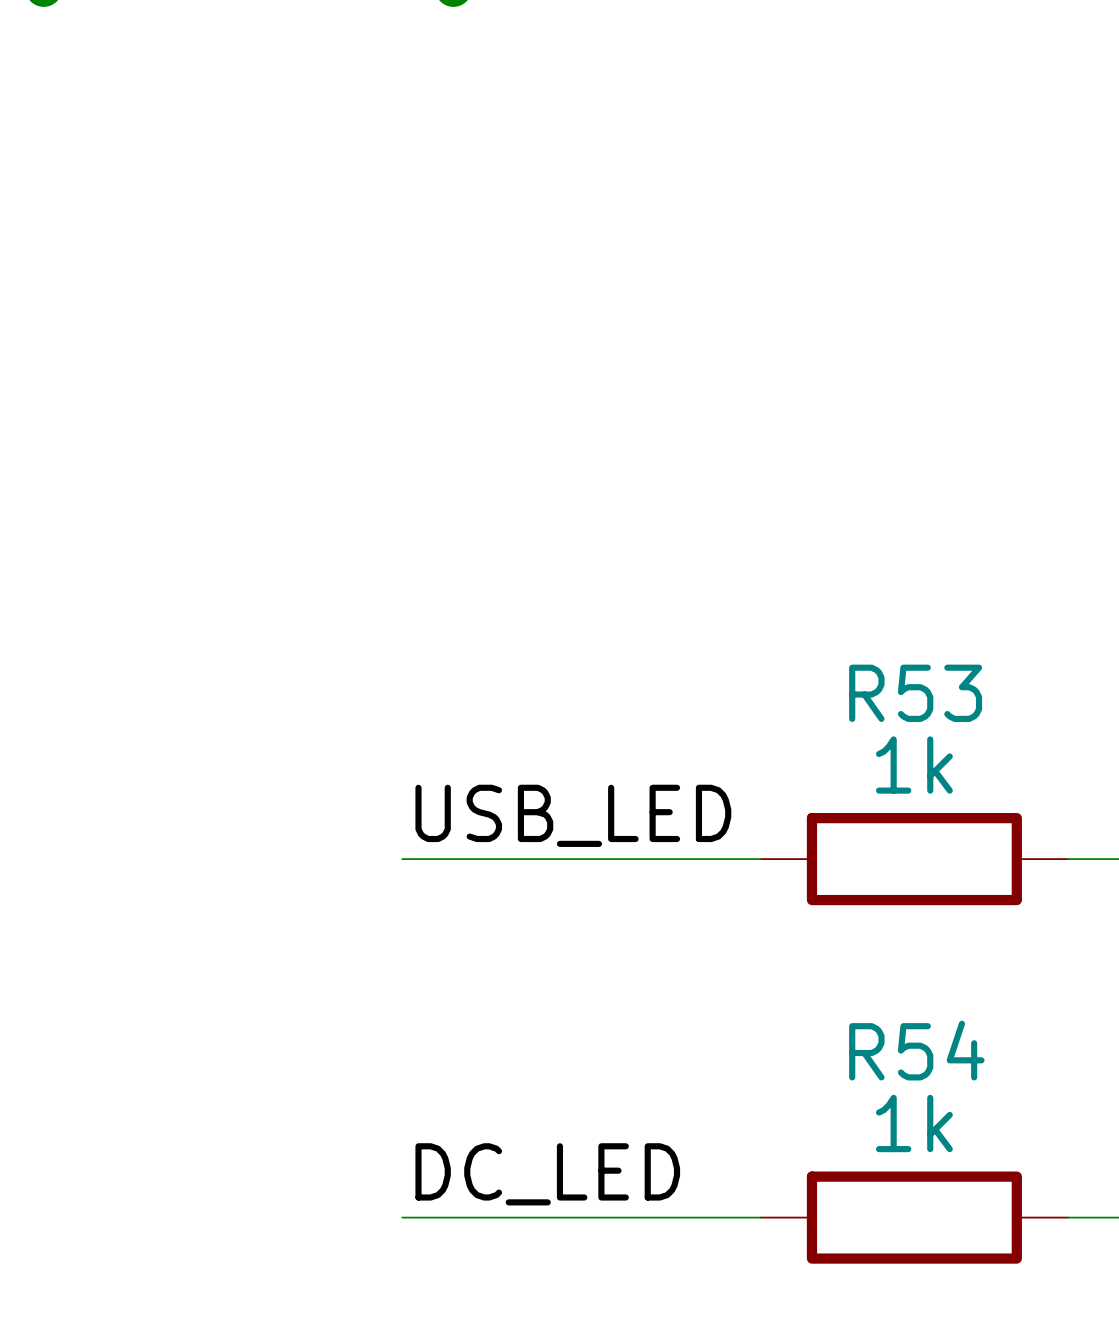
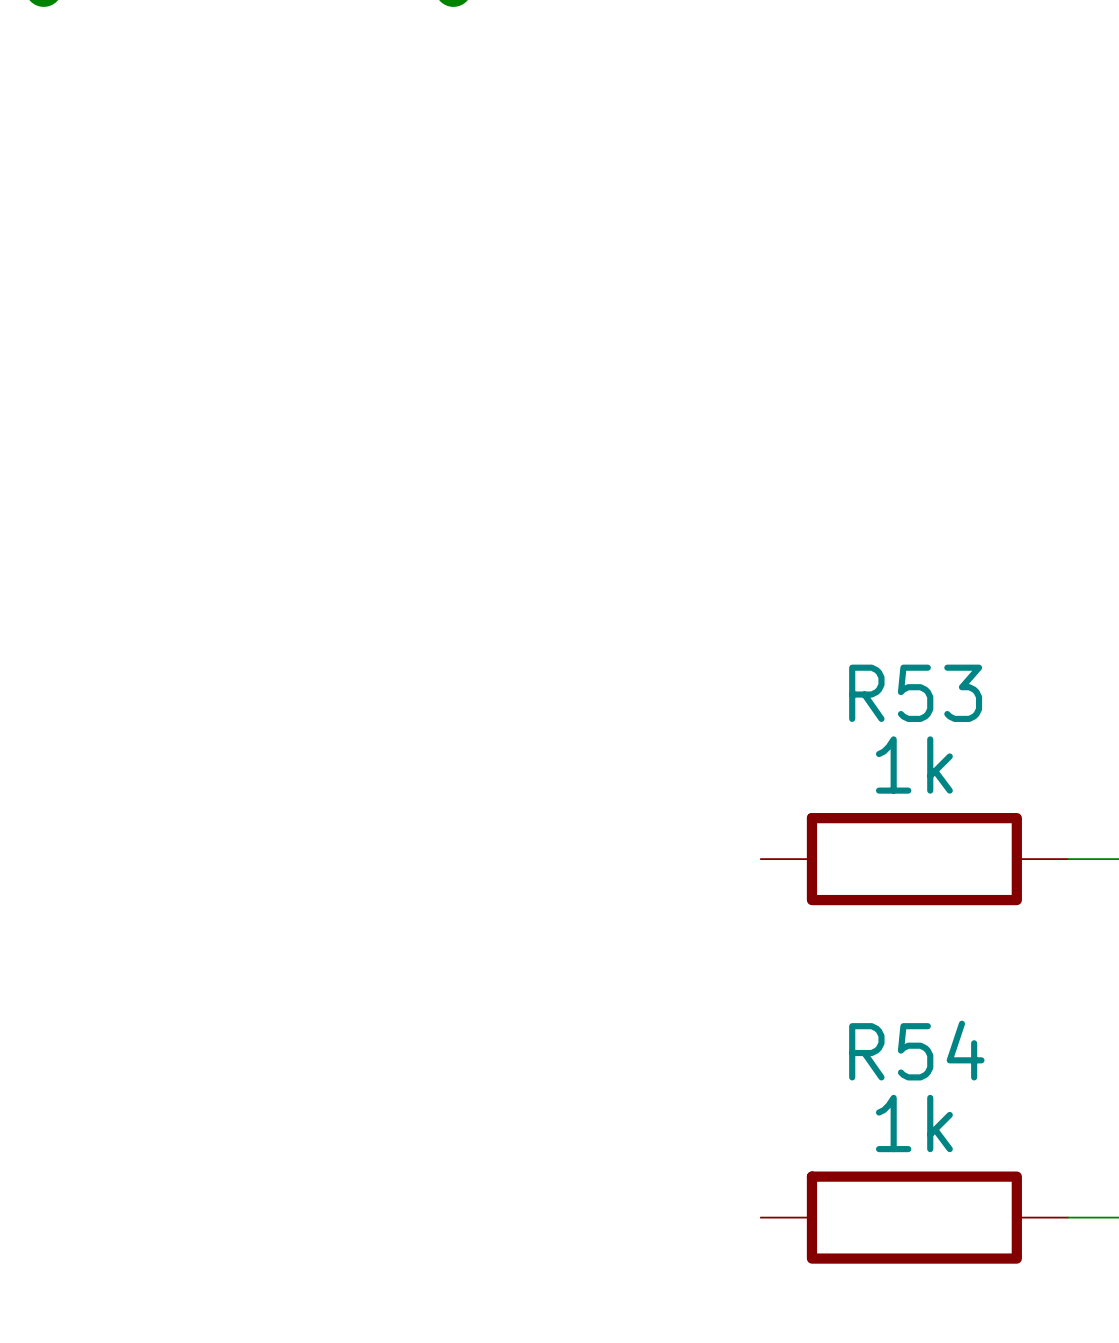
label: USB_LED (573, 815) -> none
wire: (402, 859) (760, 859) -> none
label: DC_LED (547, 1174) -> none
wire: (402, 1217) (760, 1217) -> none

